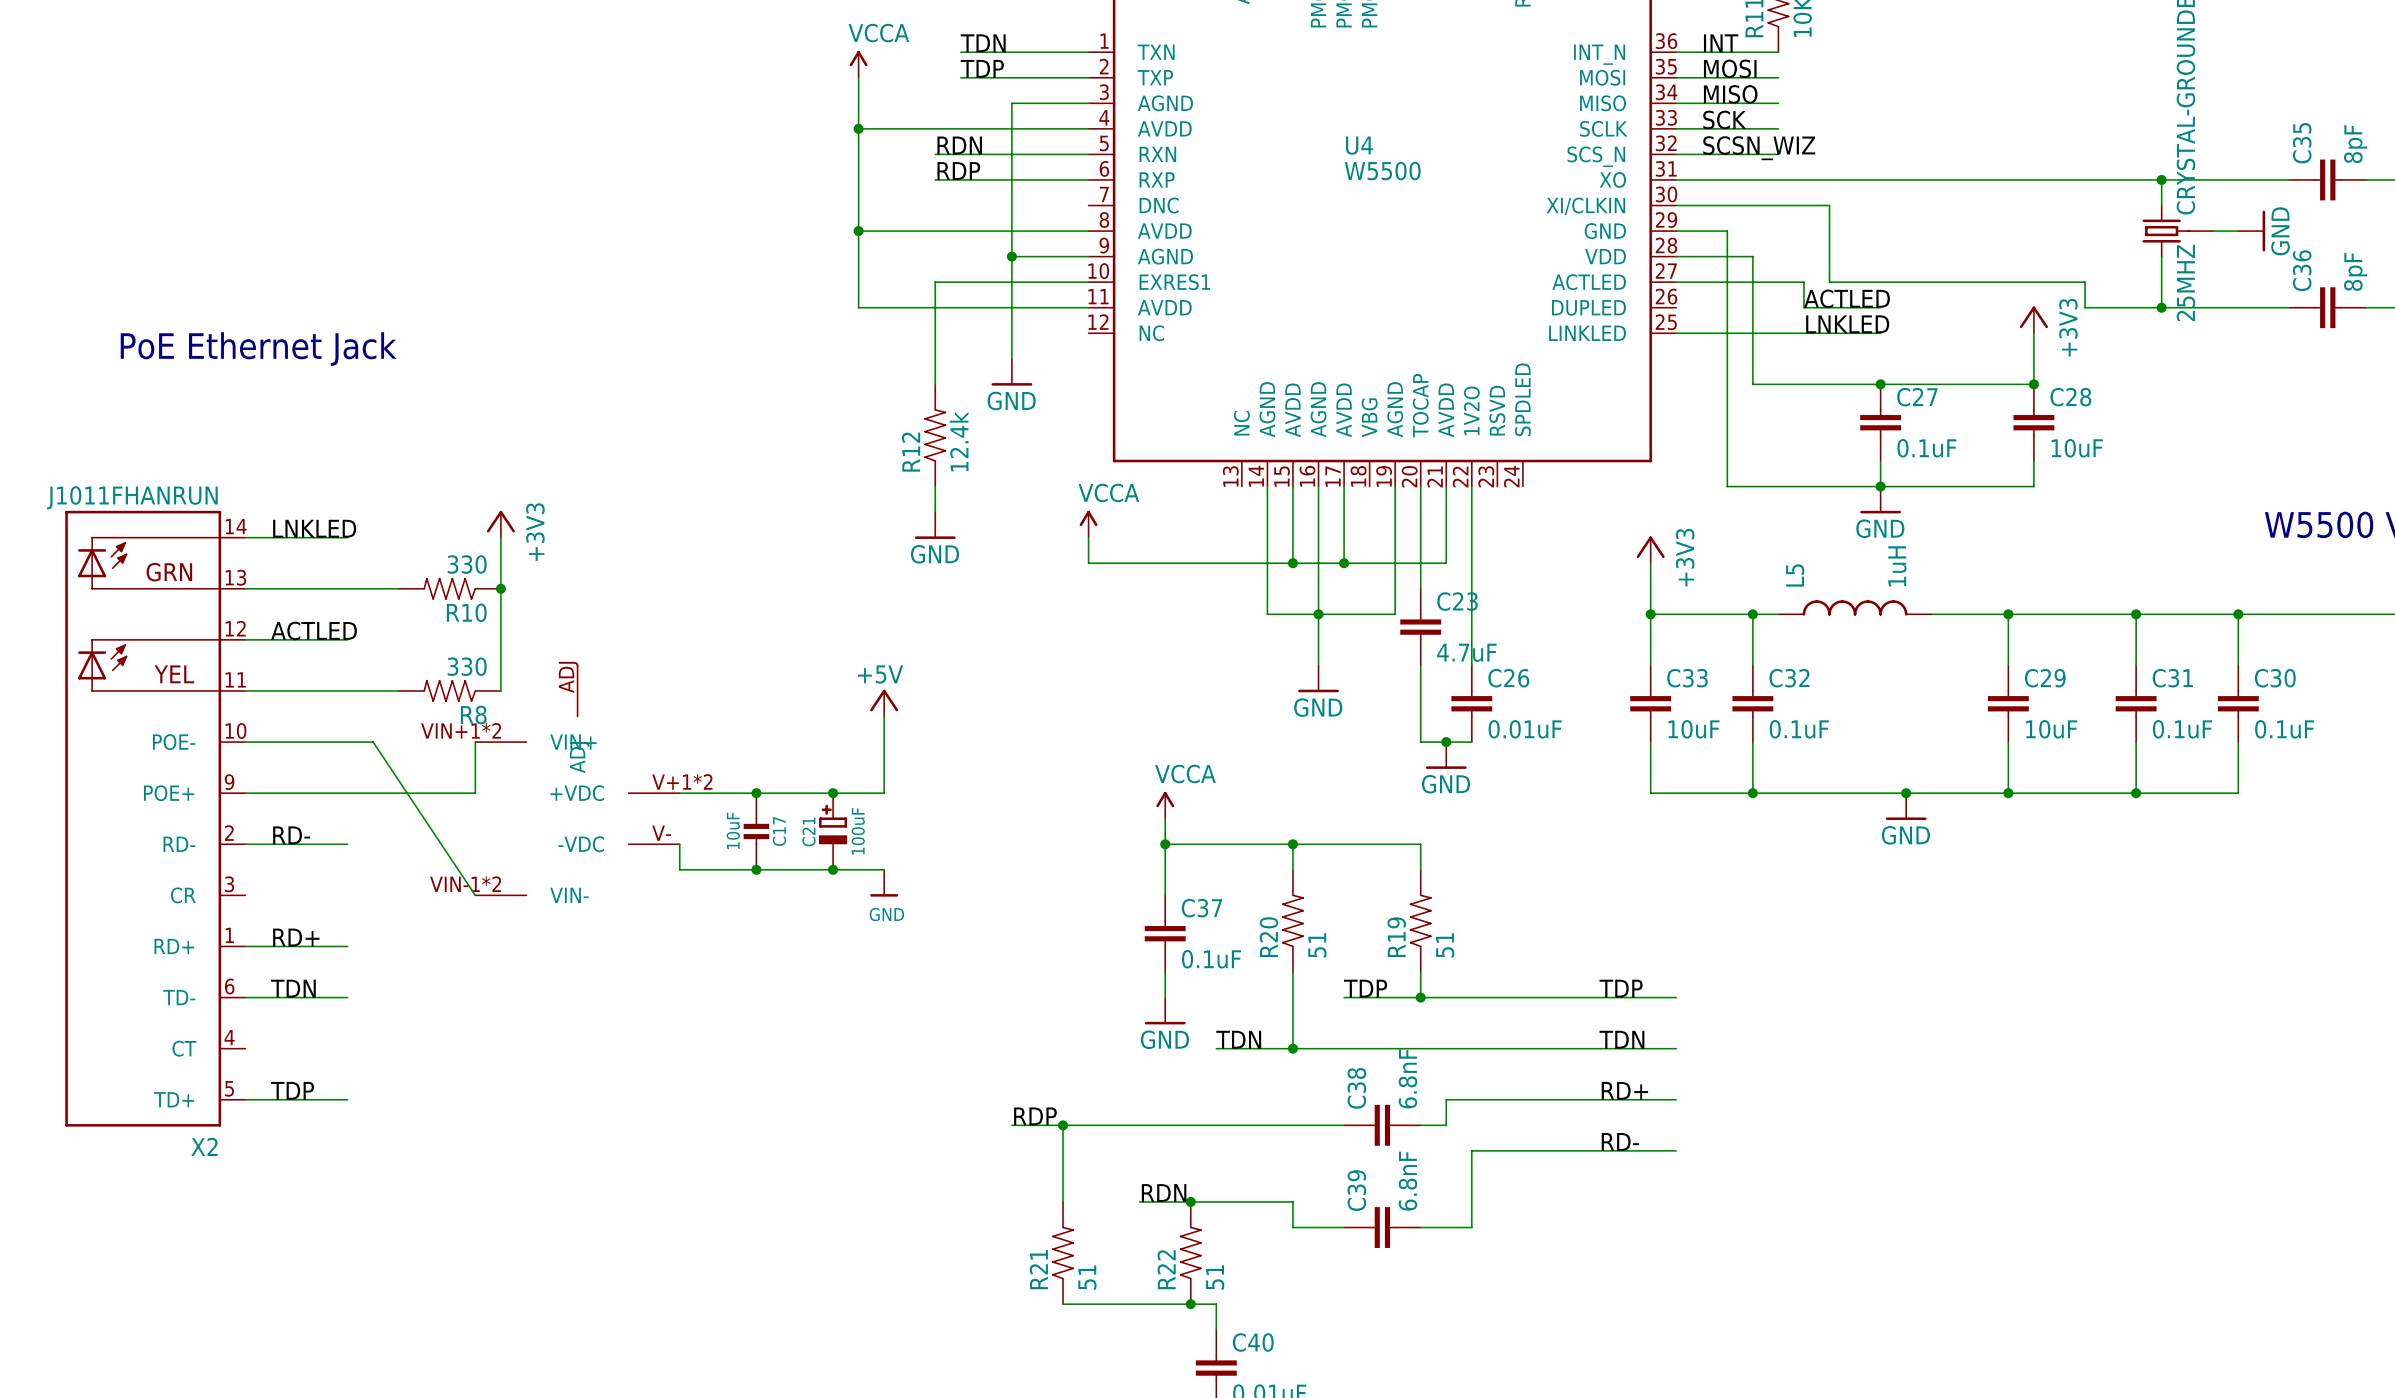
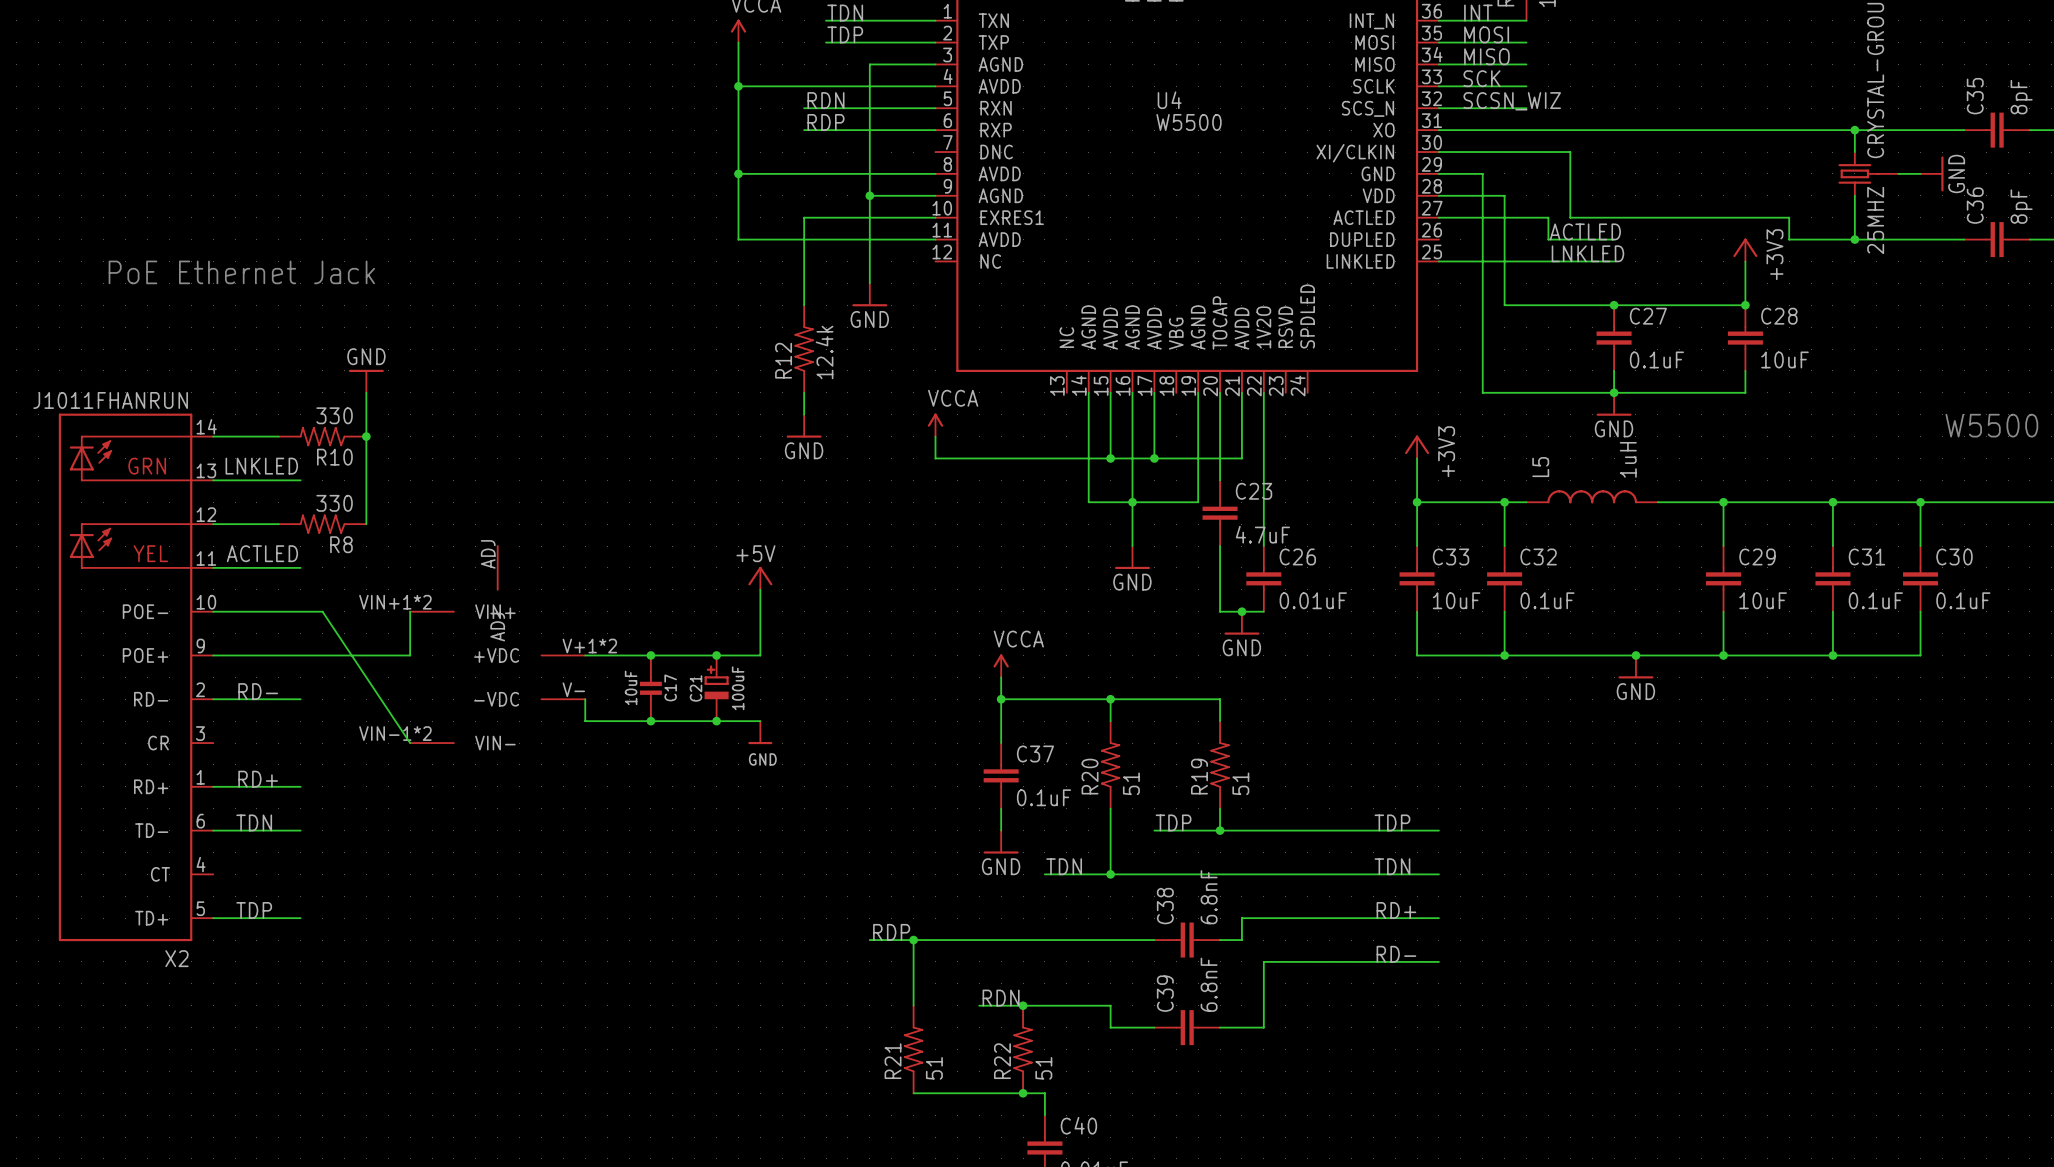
power symbol: none -> GND (366, 381)
power symbol: +3V3 (500, 524) -> none
label position: LNKLED (314, 528) -> LNKLED (261, 466)
junction: none -> (366, 436)
wire: (500, 537) (500, 690) -> (366, 392) (366, 524)
wire: (347, 588) (398, 588) -> none
R10 position: (449, 588) -> (322, 436)
junction: (500, 588) -> none
label position: ACTLED (314, 630) -> ACTLED (262, 553)
wire: (347, 690) (398, 690) -> none
R8 position: (449, 690) -> (322, 524)

